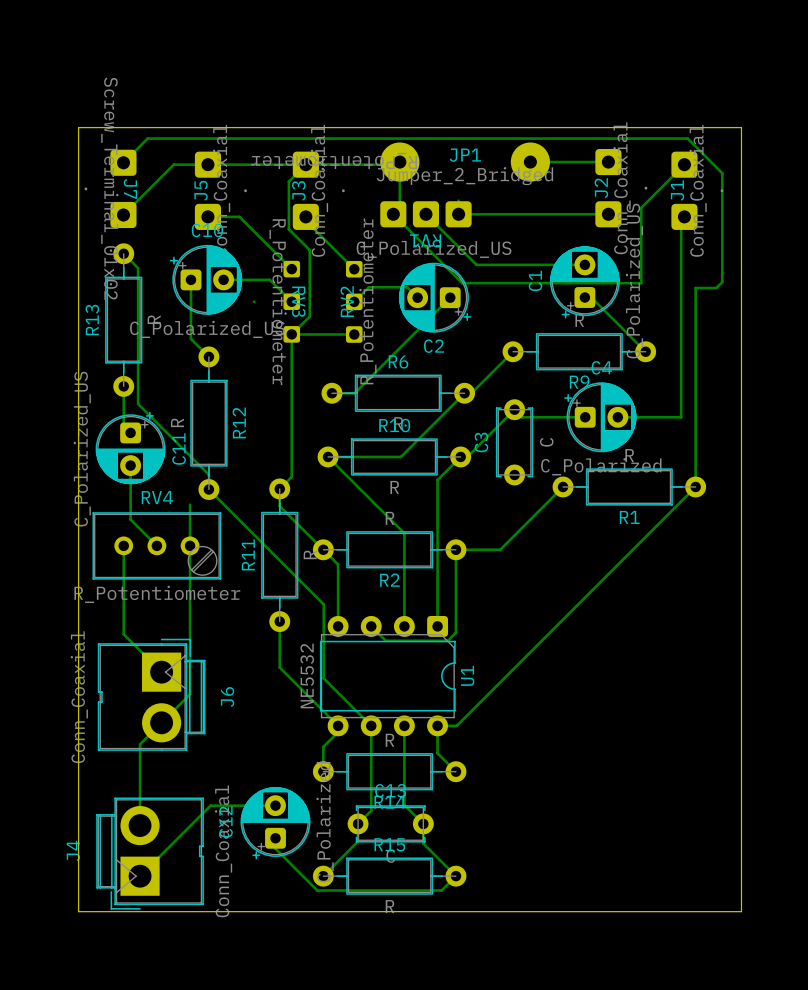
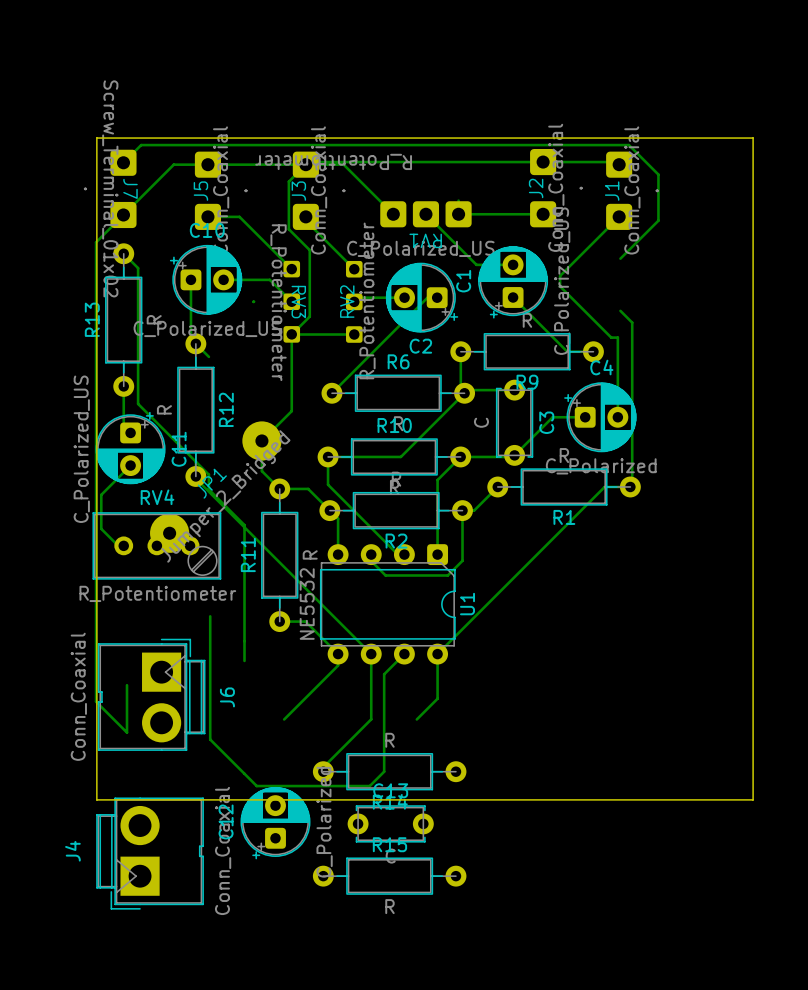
board edge: (78, 127) (741, 127) (741, 911) (78, 911) (78, 127) -> (96, 138) (96, 799) (753, 799) (753, 138) (96, 138)
bottom track: (141, 145) (147, 138) (687, 138) (722, 173) (722, 282) (716, 288) (695, 288) (695, 486) (456, 725) (437, 725) (437, 753) (455, 771) -> (141, 145) (628, 145) (658, 174) (658, 220) (620, 258)
JP1 rotation: 0° (465, 162) -> 45° counterclockwise (215, 487)
JP1 position: (465, 162) -> (215, 487)
bottom track: none -> (530, 162) (308, 162) (305, 164)
bottom track: (343, 164) (397, 164) (399, 162) (399, 207) -> (343, 164) (393, 214)
bottom track: (684, 164) (641, 207) (641, 283) (462, 283) (393, 214) -> none
J2 position: (608, 188) -> (543, 188)
J1 position: (684, 190) -> (619, 190)
bottom track: none -> (123, 214) (96, 242) (96, 701) (127, 732) (127, 685)
bottom track: (543, 214) (608, 214) -> none
bottom track: (684, 216) (681, 220) (681, 417) (617, 417) -> (619, 216) (560, 275) (560, 286) (611, 337) (617, 337) (617, 417)
bottom track: (519, 264) (584, 264) -> none
C1 position: (584, 282) -> (513, 282)
bottom track: (358, 297) (368, 287) (407, 287) (417, 297) -> (358, 297) (404, 297)
C2 position: (435, 297) -> (422, 297)
bottom track: (450, 297) (354, 393) (331, 393) -> (437, 297) (427, 297) (331, 393)
bottom track: none -> (513, 297) (567, 351) (593, 351)
bottom track: (584, 297) (591, 297) (645, 351) -> none
bottom track: none -> (620, 310) (632, 322) (632, 485) (630, 486) (604, 486) (437, 654) (437, 698) (416, 719)
bottom track: none -> (460, 351) (460, 389) (464, 393) (467, 390) (514, 390)
bottom track: (513, 351) (471, 393) -> none
R9 position: (579, 351) -> (527, 351)
bottom track: (291, 411) (291, 476) (279, 488) (279, 506) (338, 564) (338, 626) -> (291, 411) (261, 440) (261, 471) (279, 488) (308, 488) (338, 518) (338, 561)
bottom track: (552, 417) (522, 417) (514, 409) (467, 456) -> (552, 417) (513, 456) (467, 456)
R12 position: (208, 423) -> (195, 410)
C3 name position: C3 (481, 442) -> C3 (546, 422)
C3 position: (514, 442) -> (514, 422)
C3 value position: C (546, 442) -> C (481, 422)
bottom track: (328, 456) (404, 533) (404, 626) -> (328, 456) (328, 484) (404, 561)
bottom track: none -> (195, 461) (195, 478) (371, 654) (371, 719) (318, 771)
bottom track: (130, 465) (130, 519) (156, 545) -> (130, 465) (101, 494) (101, 528) (118, 545)
bottom track: none -> (497, 486) (474, 510) (462, 510) (462, 560) (447, 575) (385, 575) (371, 561)
bottom track: (563, 486) (500, 549) (455, 549) (455, 632) (447, 640) (385, 640) (371, 626) -> none
R1 position: (629, 486) -> (564, 486)
bottom track: (190, 504) (190, 694) (140, 744) (140, 825) -> none
bottom track: (244, 525) (323, 604) (323, 678) (371, 725) (371, 810) (358, 823) (358, 841) (323, 876) -> (244, 525) (244, 660)
bottom track: (123, 545) (123, 634) (161, 672) -> none
R2 position: (389, 549) -> (396, 510)
bottom track: (437, 561) (437, 626) -> none
bottom track: none -> (210, 616) (210, 739) (256, 786) (369, 786) (384, 771) (384, 674) (404, 654)
bottom track: (279, 621) (279, 667) (338, 725) (338, 732) (323, 746) (323, 771) -> (279, 621) (305, 621) (338, 654) (338, 665) (284, 719)
U1 position: (387, 676) -> (387, 604)
bottom track: (404, 725) (404, 804) (423, 823) (423, 843) (455, 876) (441, 890) (317, 890) (275, 848) (275, 838) -> none
bottom track: (275, 805) (210, 805) (140, 876) -> none

